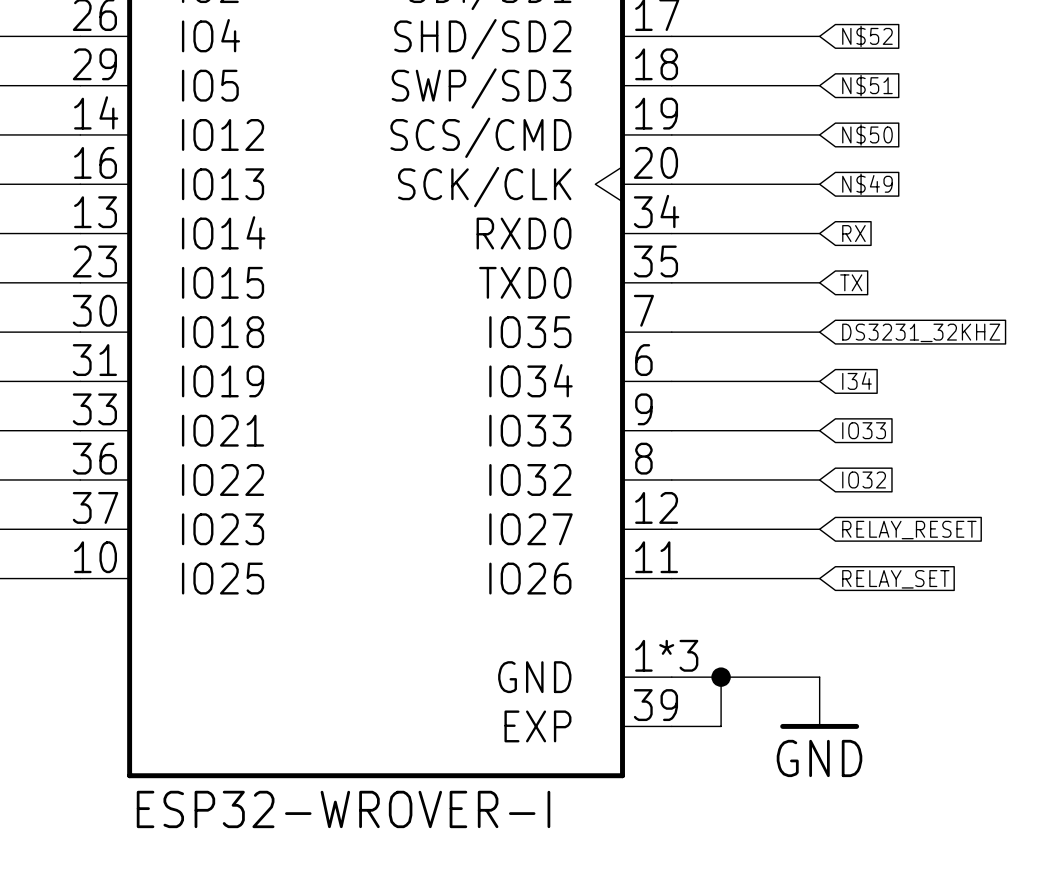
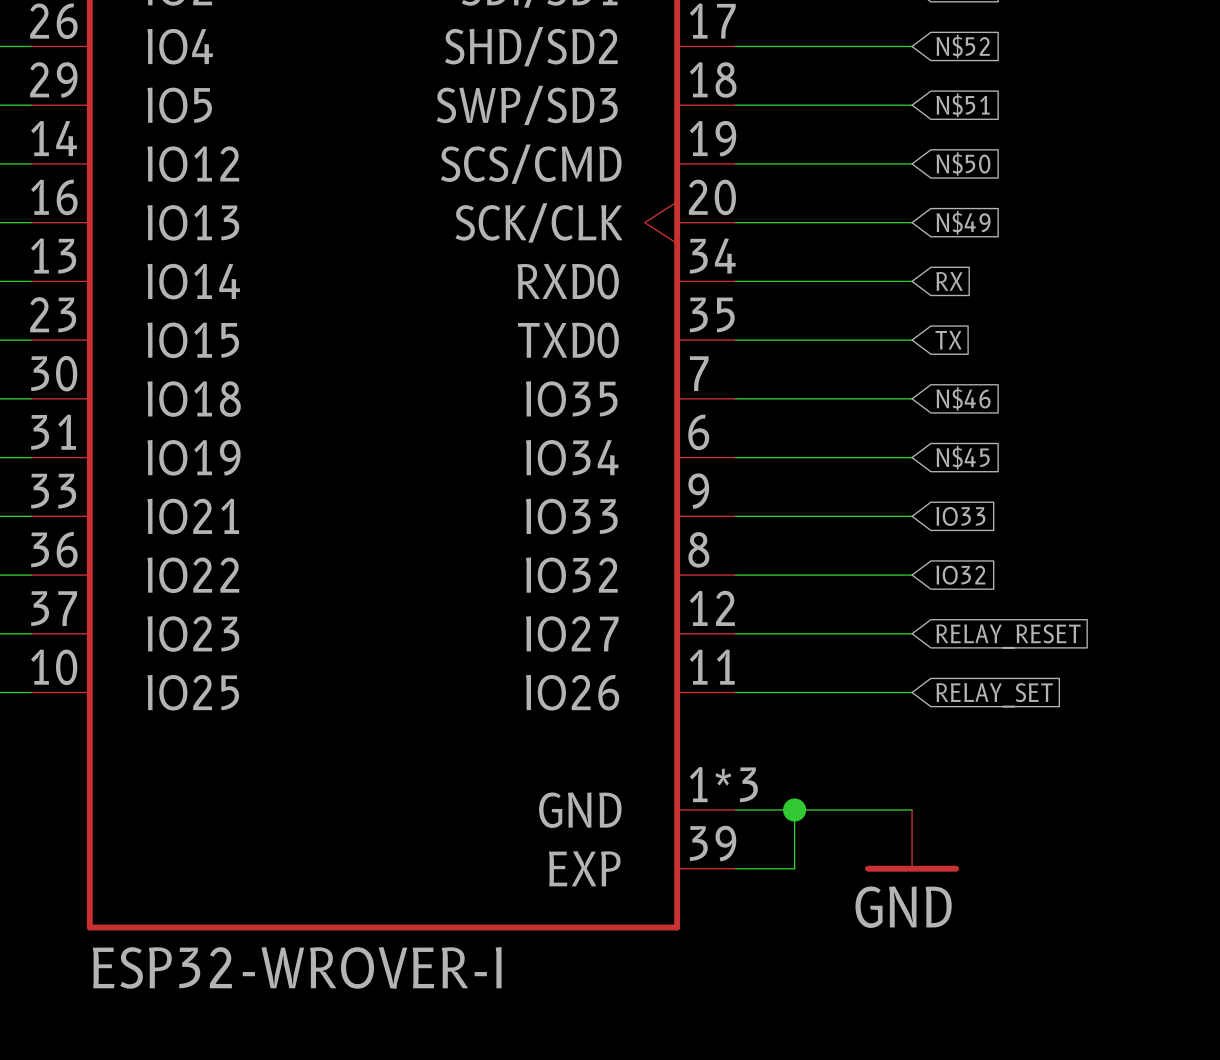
global label: DS3231_32KHZ (921, 332) -> N$46 (963, 398)
global label: I34 (856, 381) -> N$45 (963, 457)

